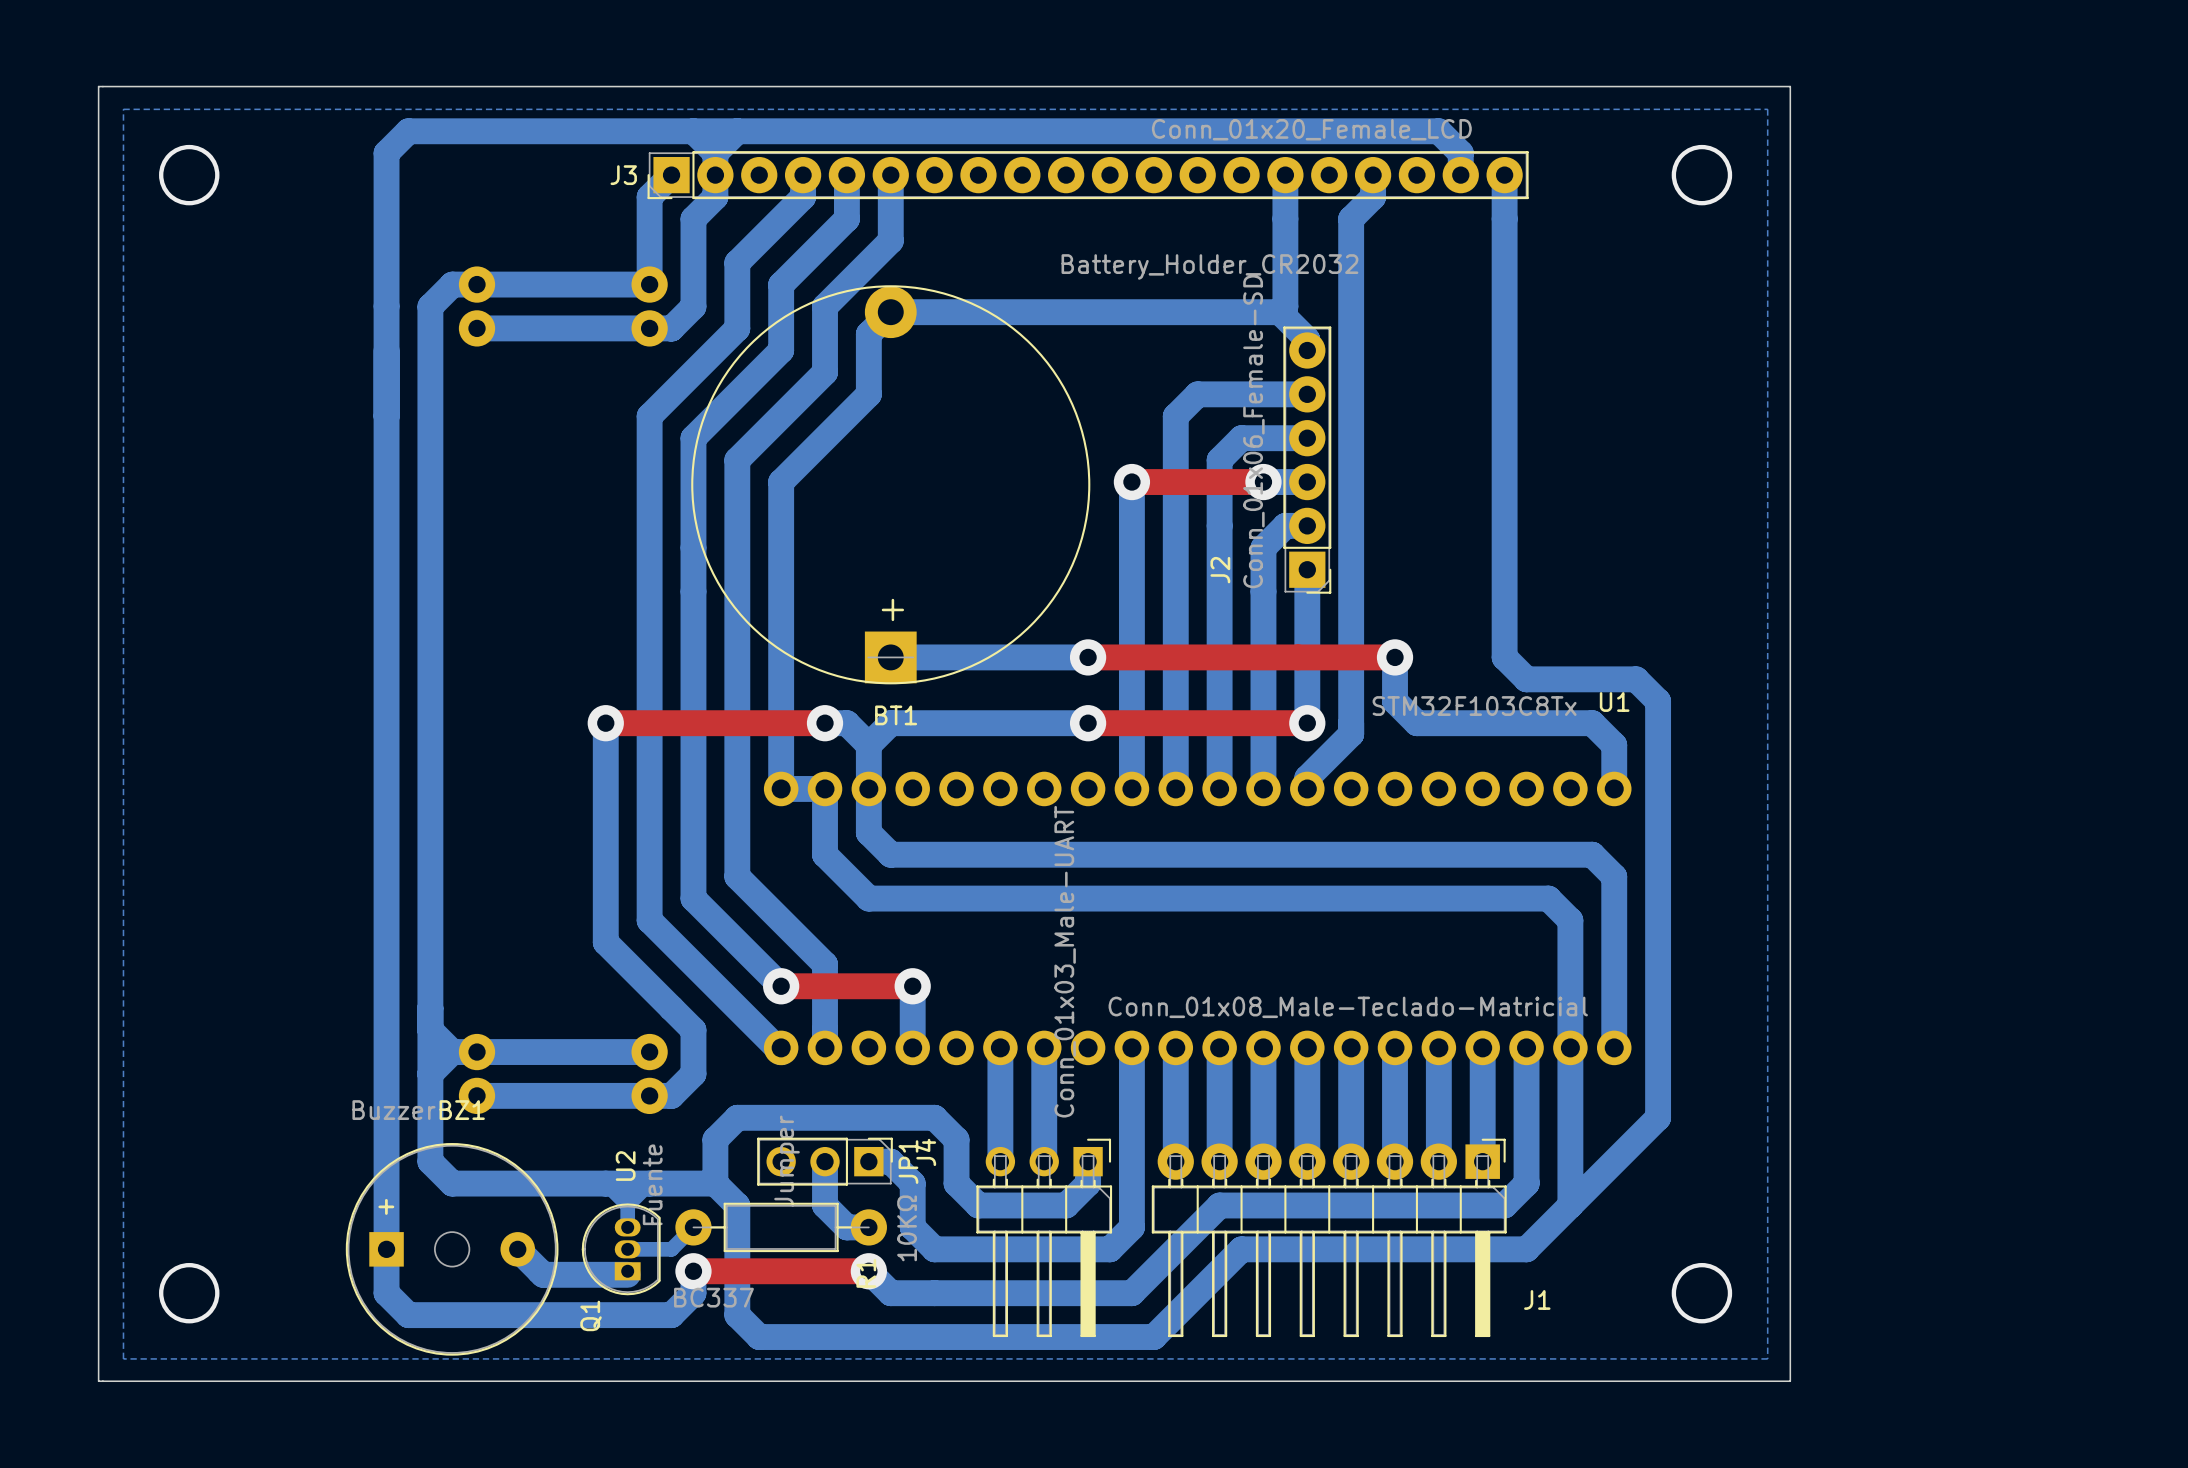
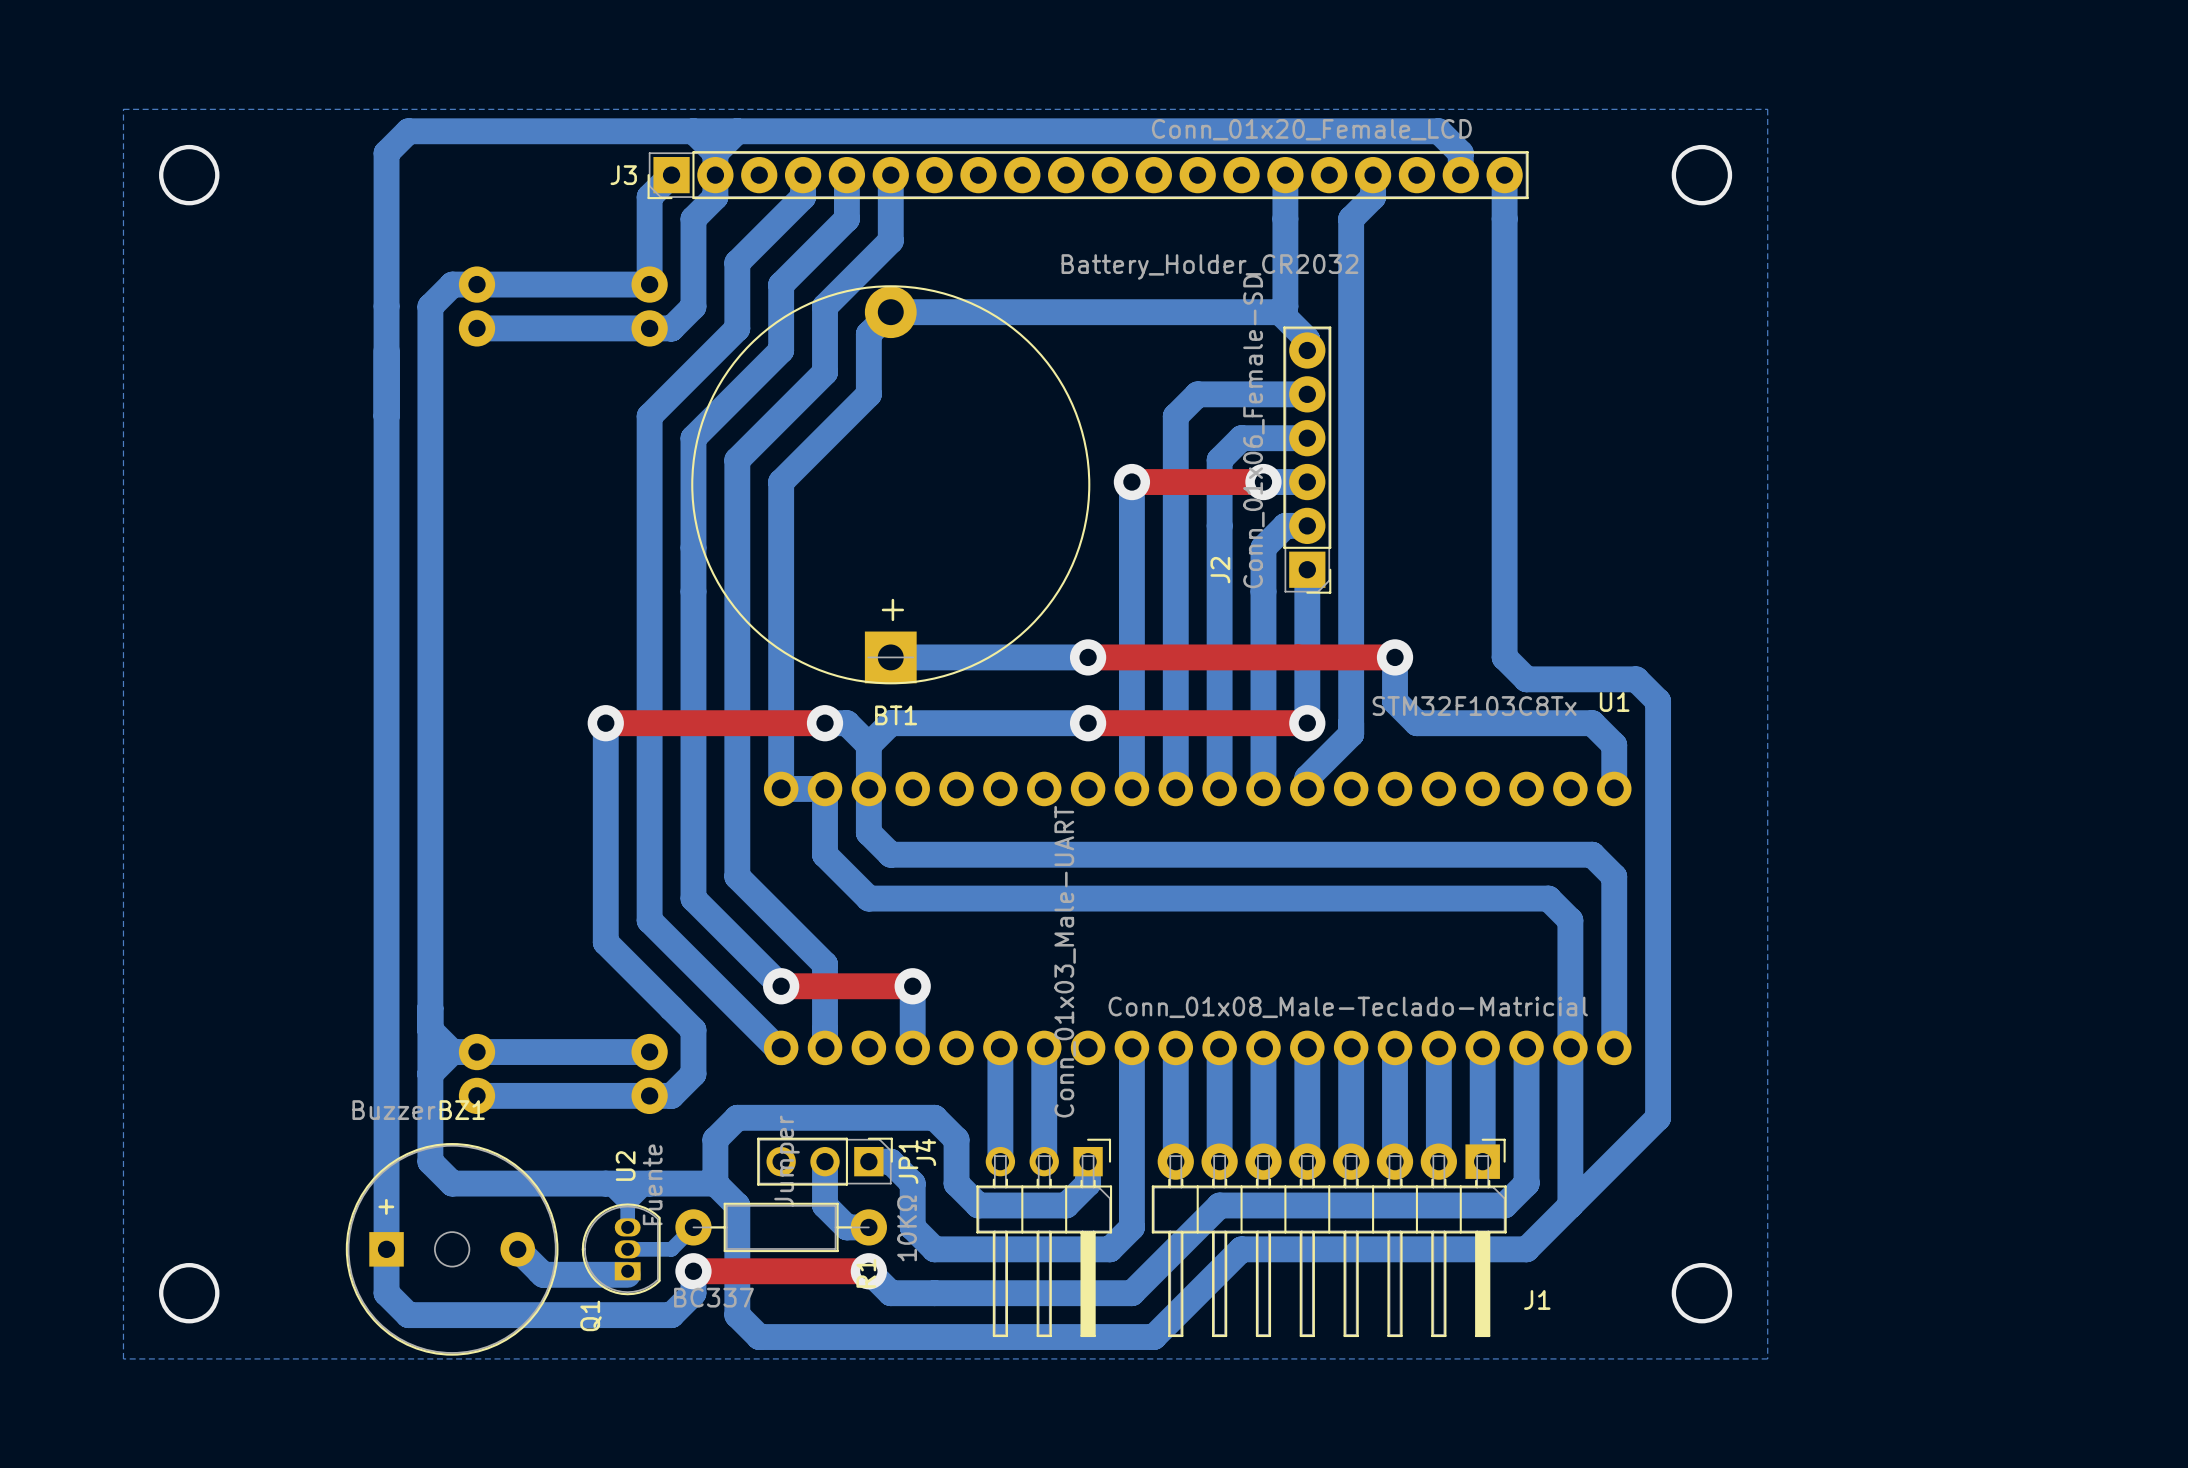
board edge: (98, 86) (1790, 86) (1790, 1381) (98, 1381) (98, 86) -> none

